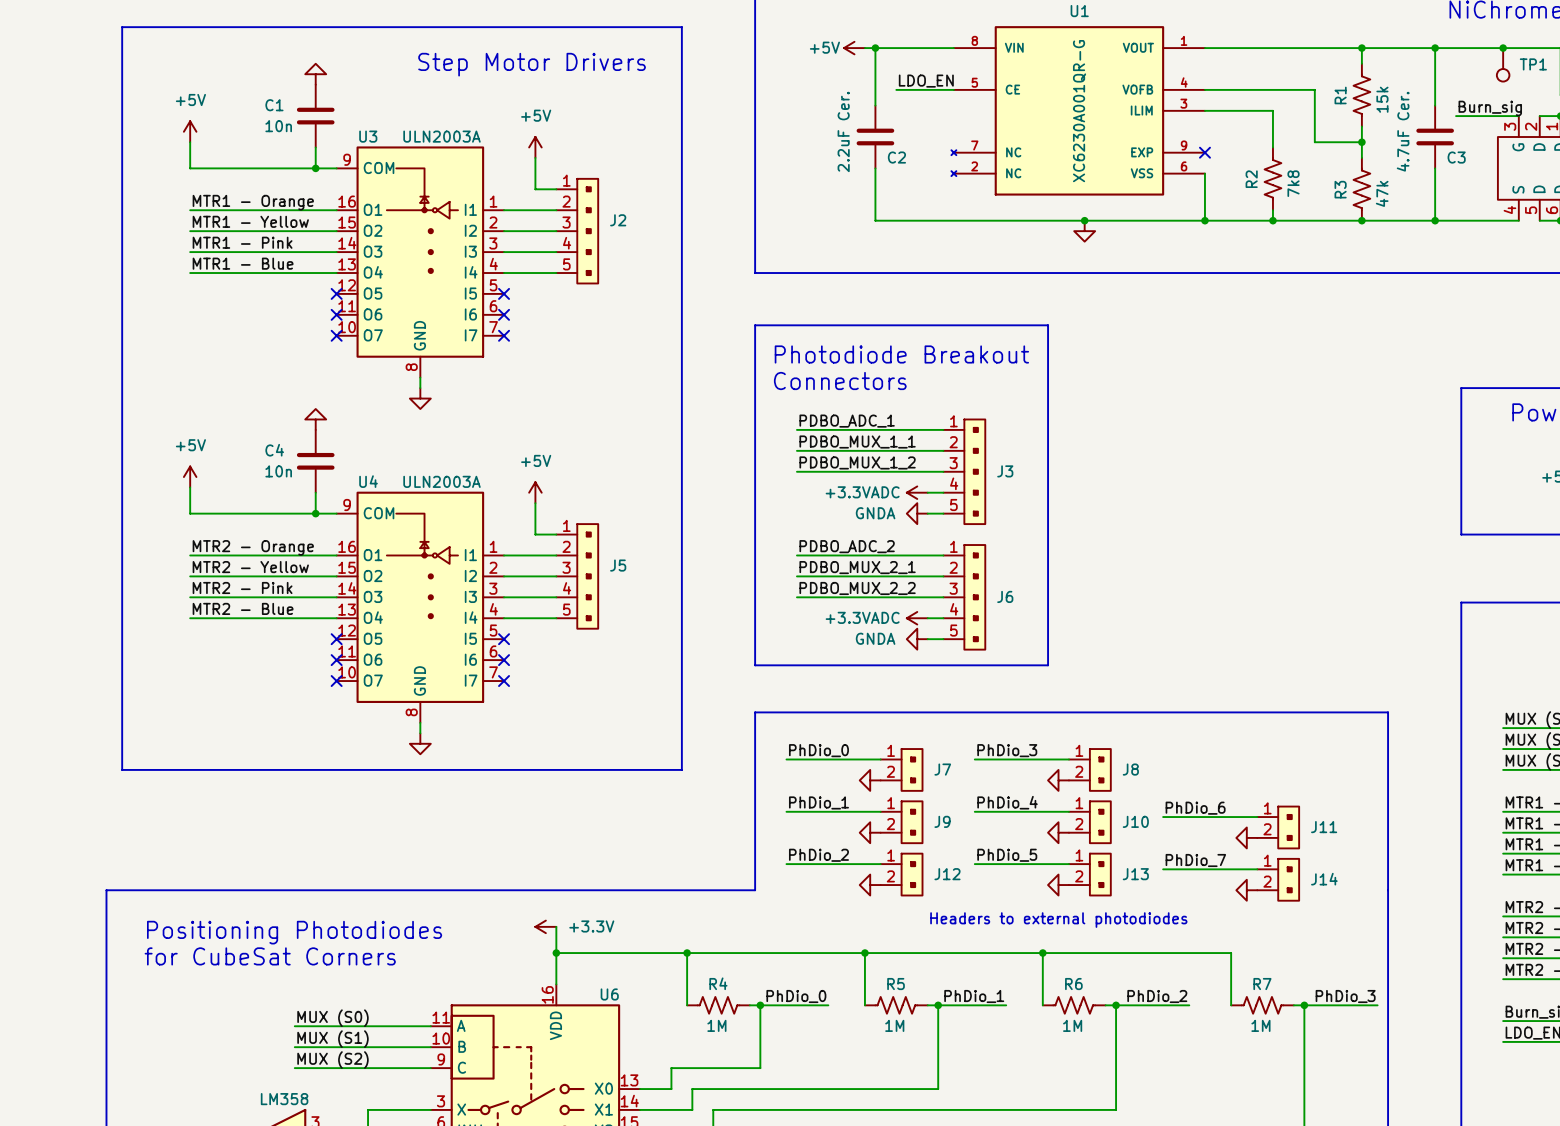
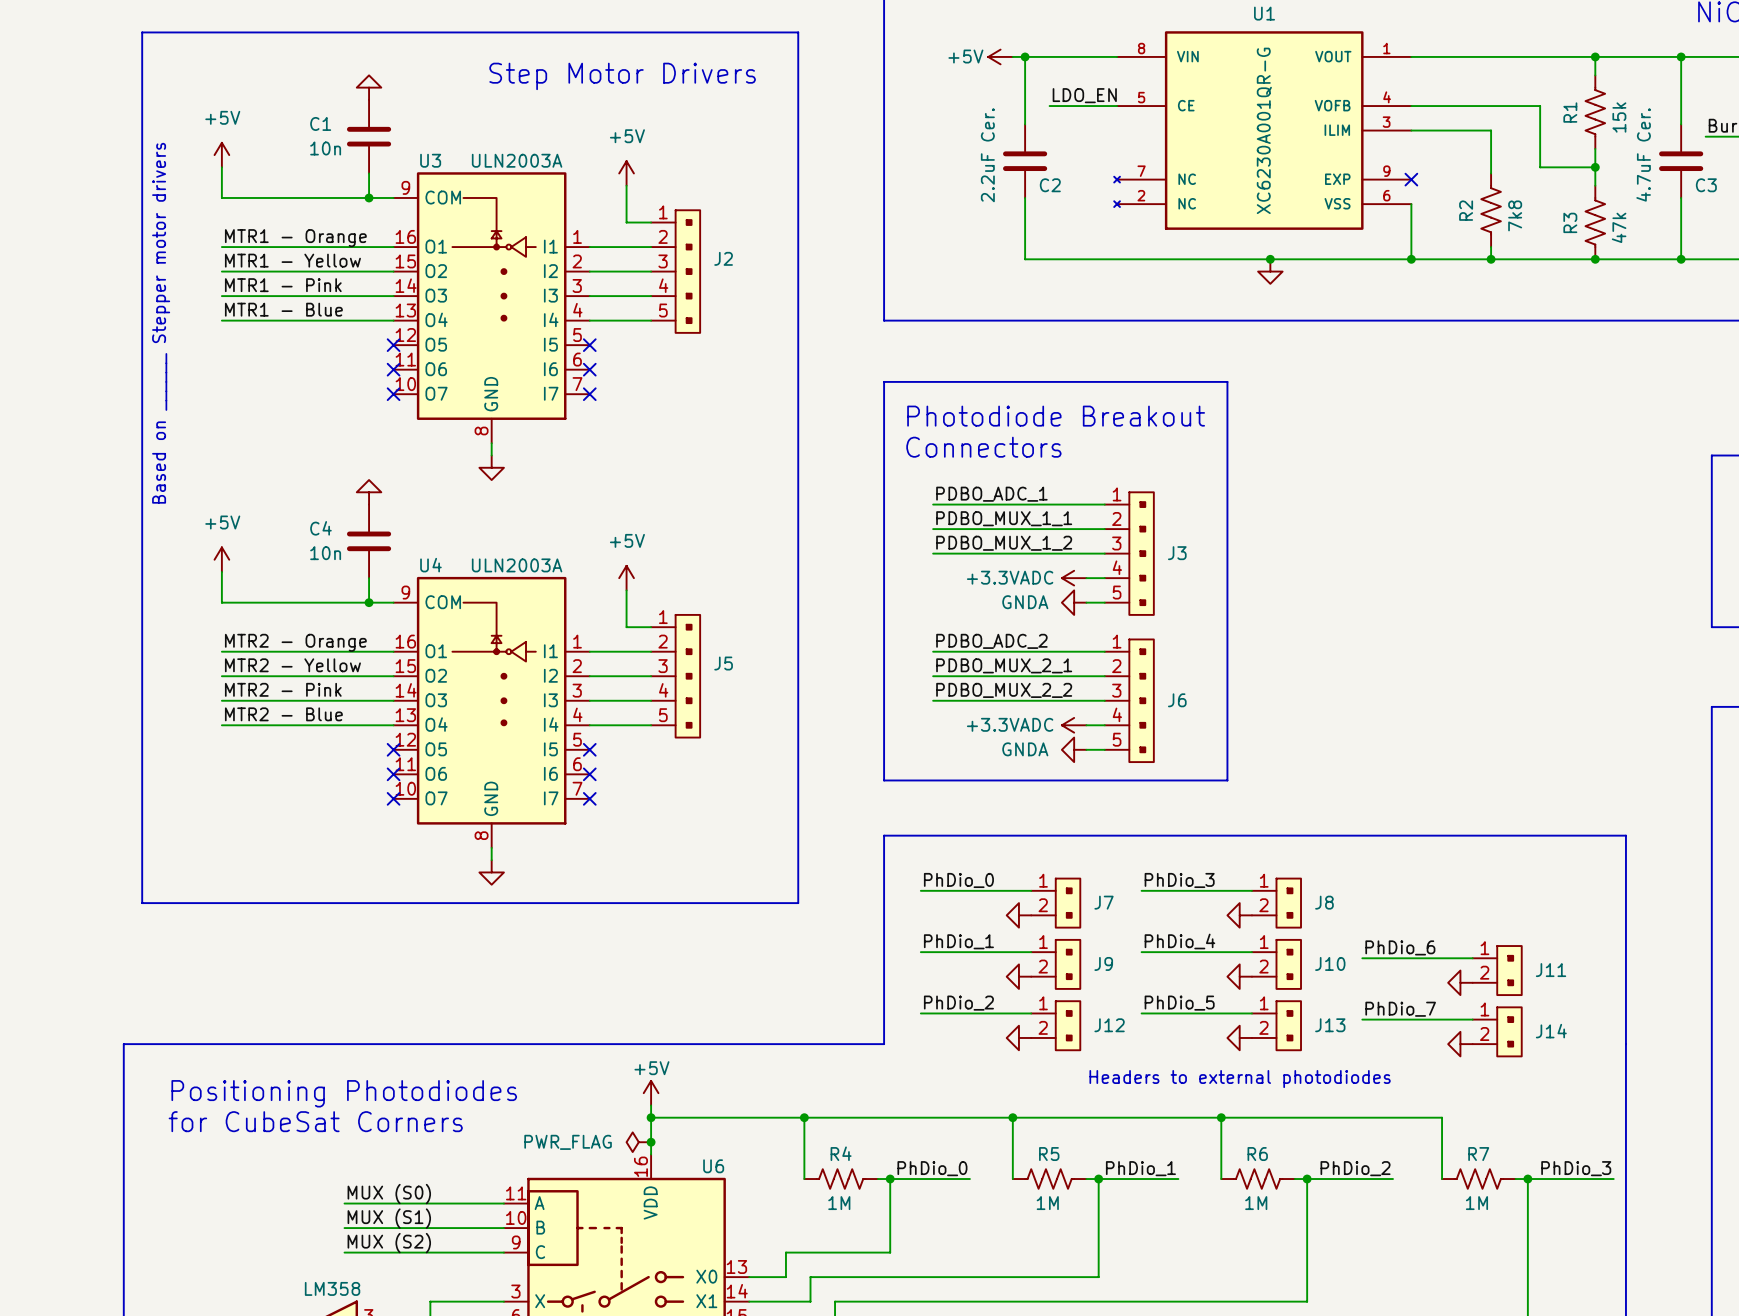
text: none -> Based on ______ Stepper motor drivers (161, 323)
power symbol: +3.3V (545, 926) -> none
power symbol: none -> +5V (651, 1093)
power symbol: none -> PWR_FLAG (638, 1142)
junction: none -> (651, 1142)

